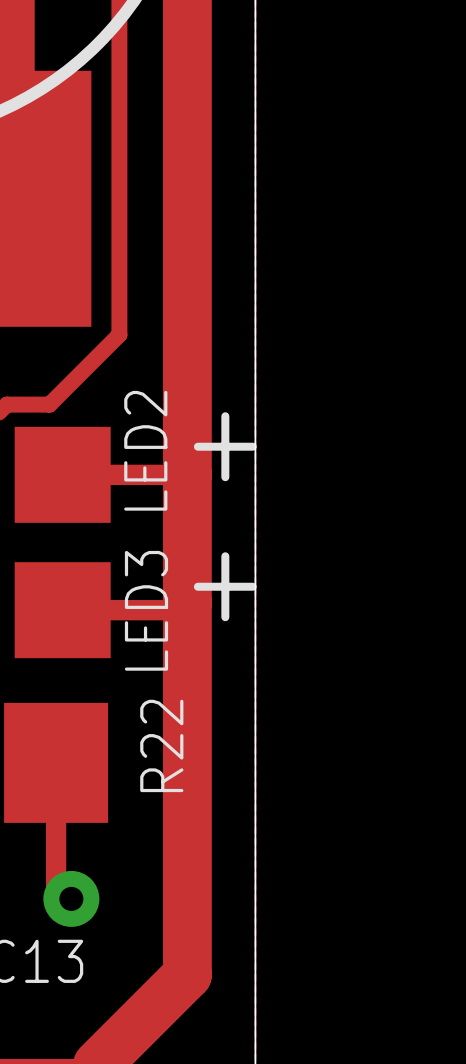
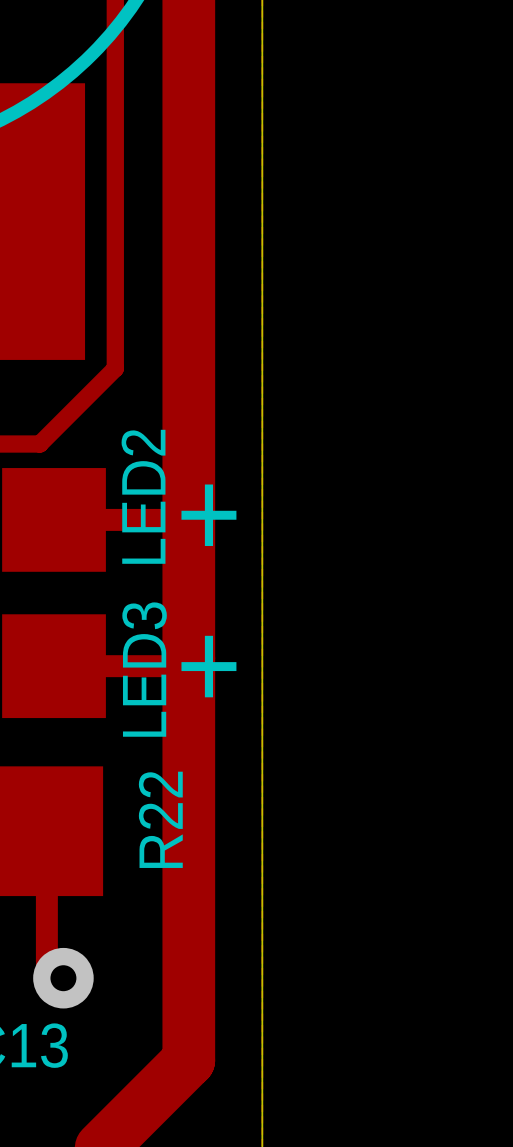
text position: + (225, 446) -> + (208, 515)
text position: + (225, 586) -> + (208, 666)

